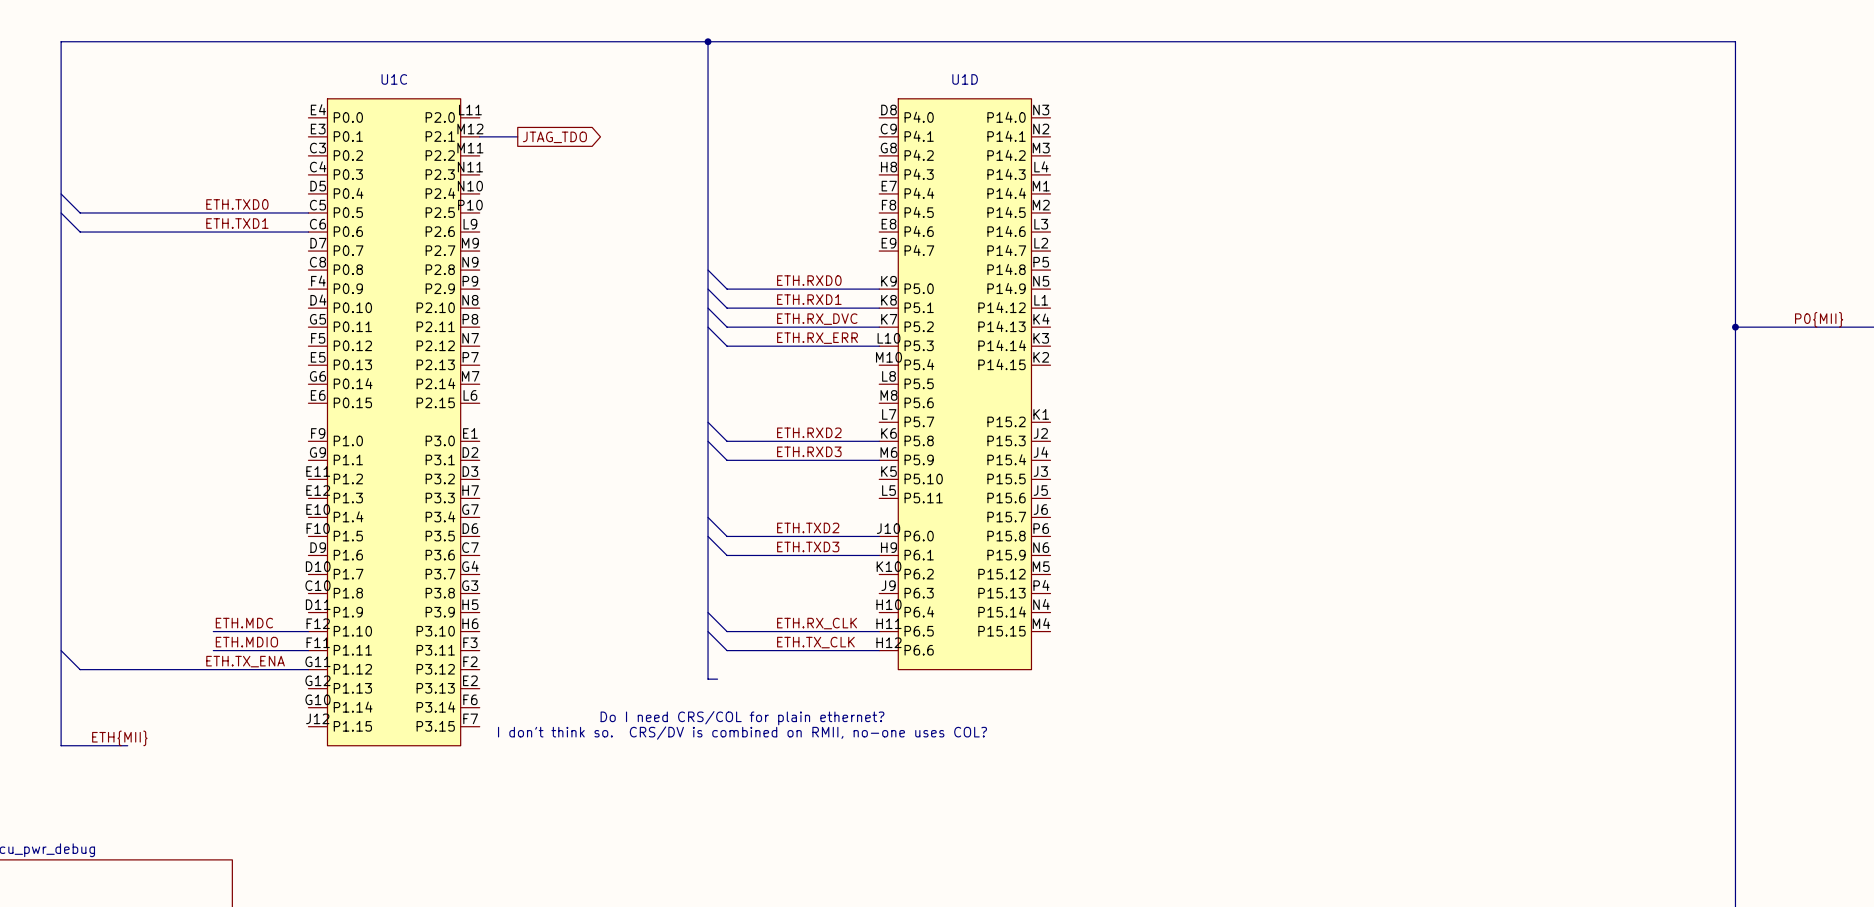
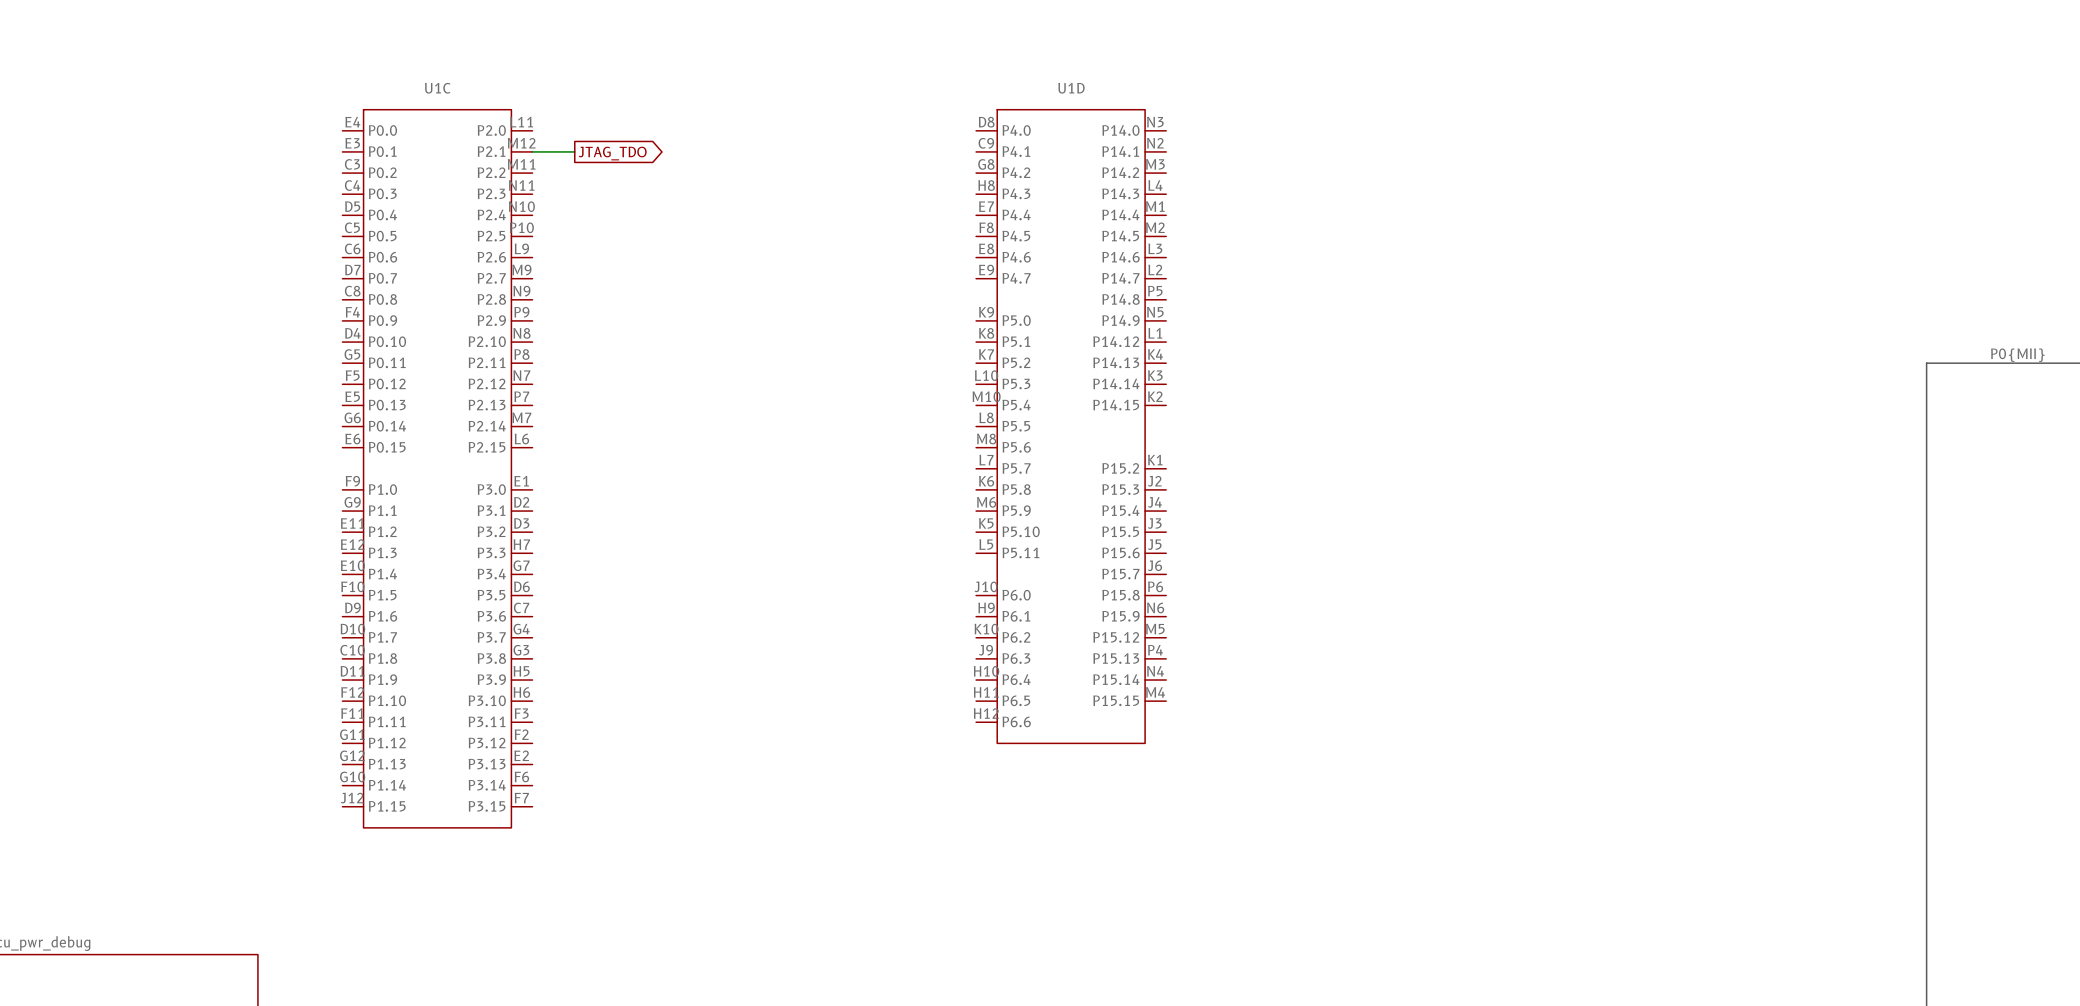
bus: (708, 41) (708, 679) (717, 679) -> none
junction: (708, 41) -> none
wire: (61, 193) (80, 212) (308, 212) -> none
label: ETH.TXD0 (237, 204) -> none
wire: (61, 212) (80, 232) (308, 232) -> none
label: ETH.TXD1 (237, 223) -> none
wire: (708, 270) (727, 289) (879, 289) -> none
label: ETH.RXD0 (809, 280) -> none
wire: (708, 289) (727, 308) (879, 308) -> none
label: ETH.RXD1 (809, 299) -> none
wire: (708, 308) (727, 327) (879, 327) -> none
label: ETH.RX_DVC (817, 319) -> none
wire: (708, 327) (727, 346) (879, 346) -> none
bus: (1735, 327) (1735, 41) (61, 41) (61, 745) (127, 745) -> none
junction: (1735, 327) -> none
label: ETH.RX_ERR (817, 338) -> none
wire: (708, 422) (727, 441) (879, 441) -> none
label: ETH.RXD2 (809, 432) -> none
wire: (708, 441) (727, 460) (879, 460) -> none
label: ETH.RXD3 (809, 451) -> none
wire: (708, 517) (727, 536) (879, 536) -> none
label: ETH.TXD2 (808, 527) -> none
wire: (708, 536) (727, 555) (879, 555) -> none
label: ETH.TXD3 (808, 546) -> none
wire: (708, 612) (727, 631) (879, 631) -> none
label: ETH.MDC (244, 623) -> none
label: ETH.RX_CLK (817, 623) -> none
wire: (213, 631) (308, 631) -> none
wire: (708, 631) (727, 650) (879, 650) -> none
label: ETH.MDIO (246, 642) -> none
label: ETH.TX_CLK (815, 642) -> none
wire: (61, 650) (80, 669) (308, 669) -> none
wire: (213, 650) (308, 650) -> none
label: ETH.TX_ENA (245, 661) -> none
text: Do I need CRS/COL for plain ethernet? (742, 718) -> none
text: I don't think so. CRS/DV is combined on RMII, no-one uses COL? (742, 733) -> none
label: ETH{MII} (119, 738) -> none

